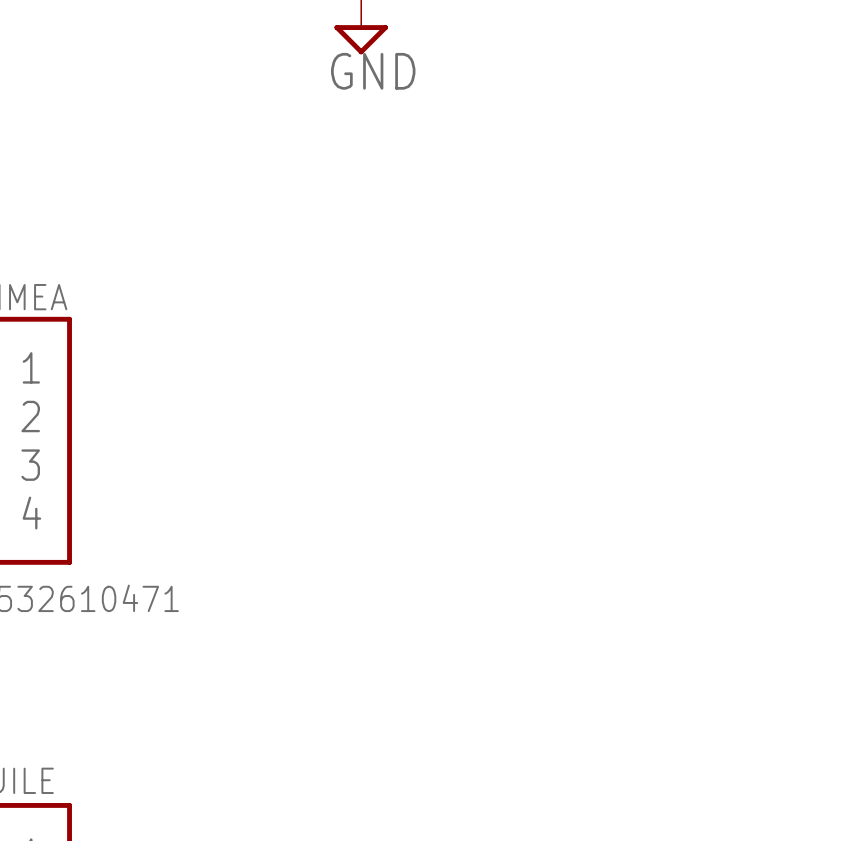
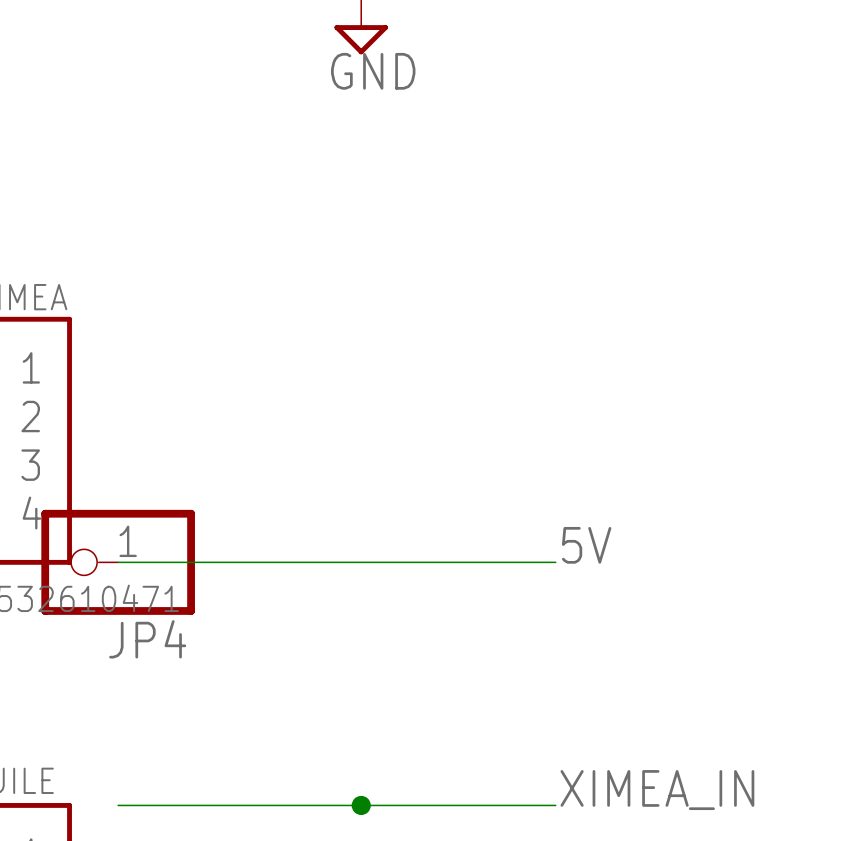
label: none -> 5V (586, 545)
wire: none -> (118, 562) (555, 562)
JP4: none -> (118, 562)
label: none -> XIMEA_IN (657, 790)
wire: none -> (118, 805) (555, 805)
junction: none -> (361, 805)

